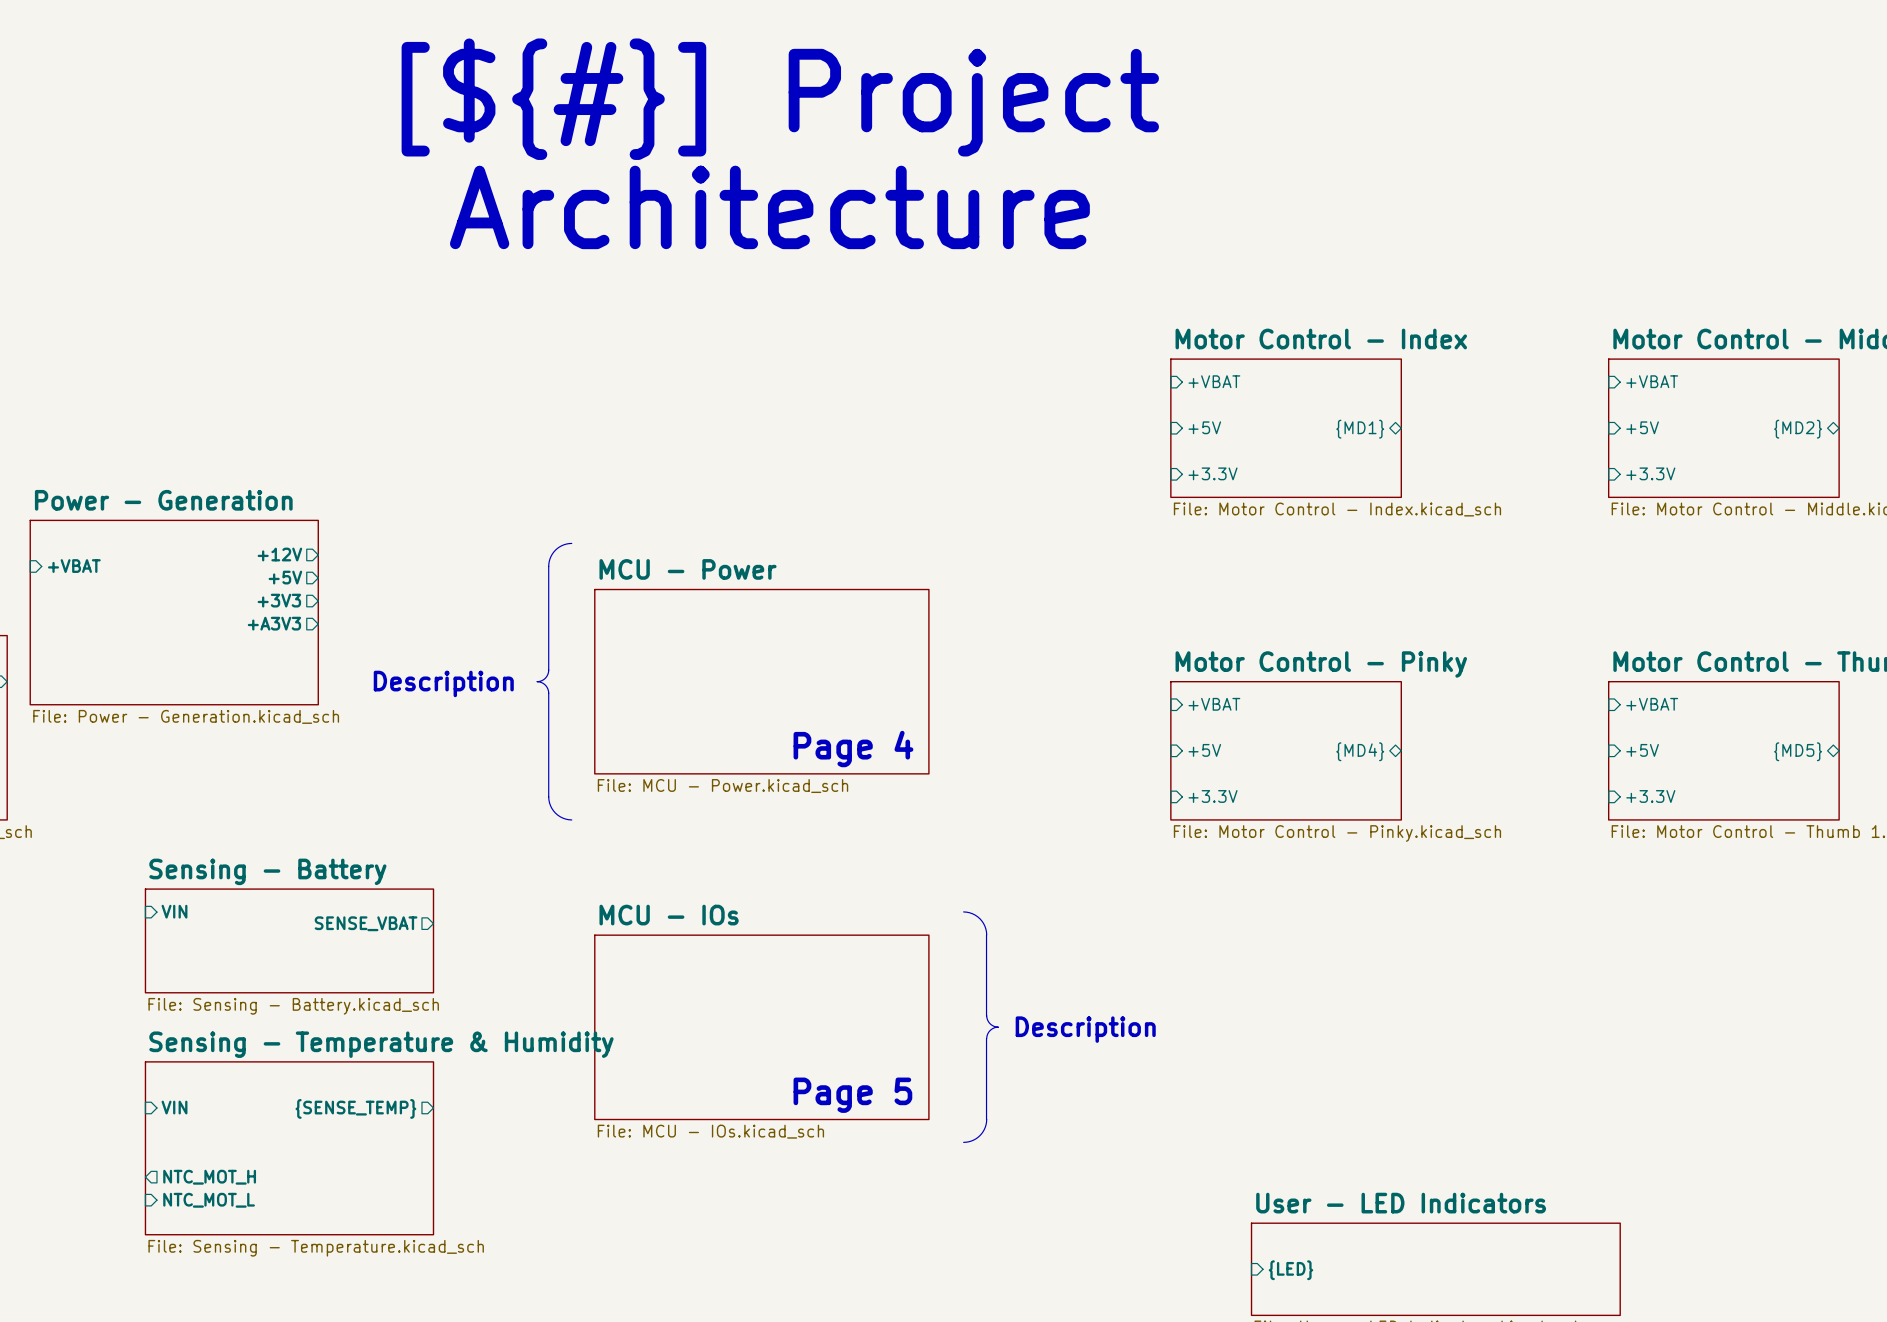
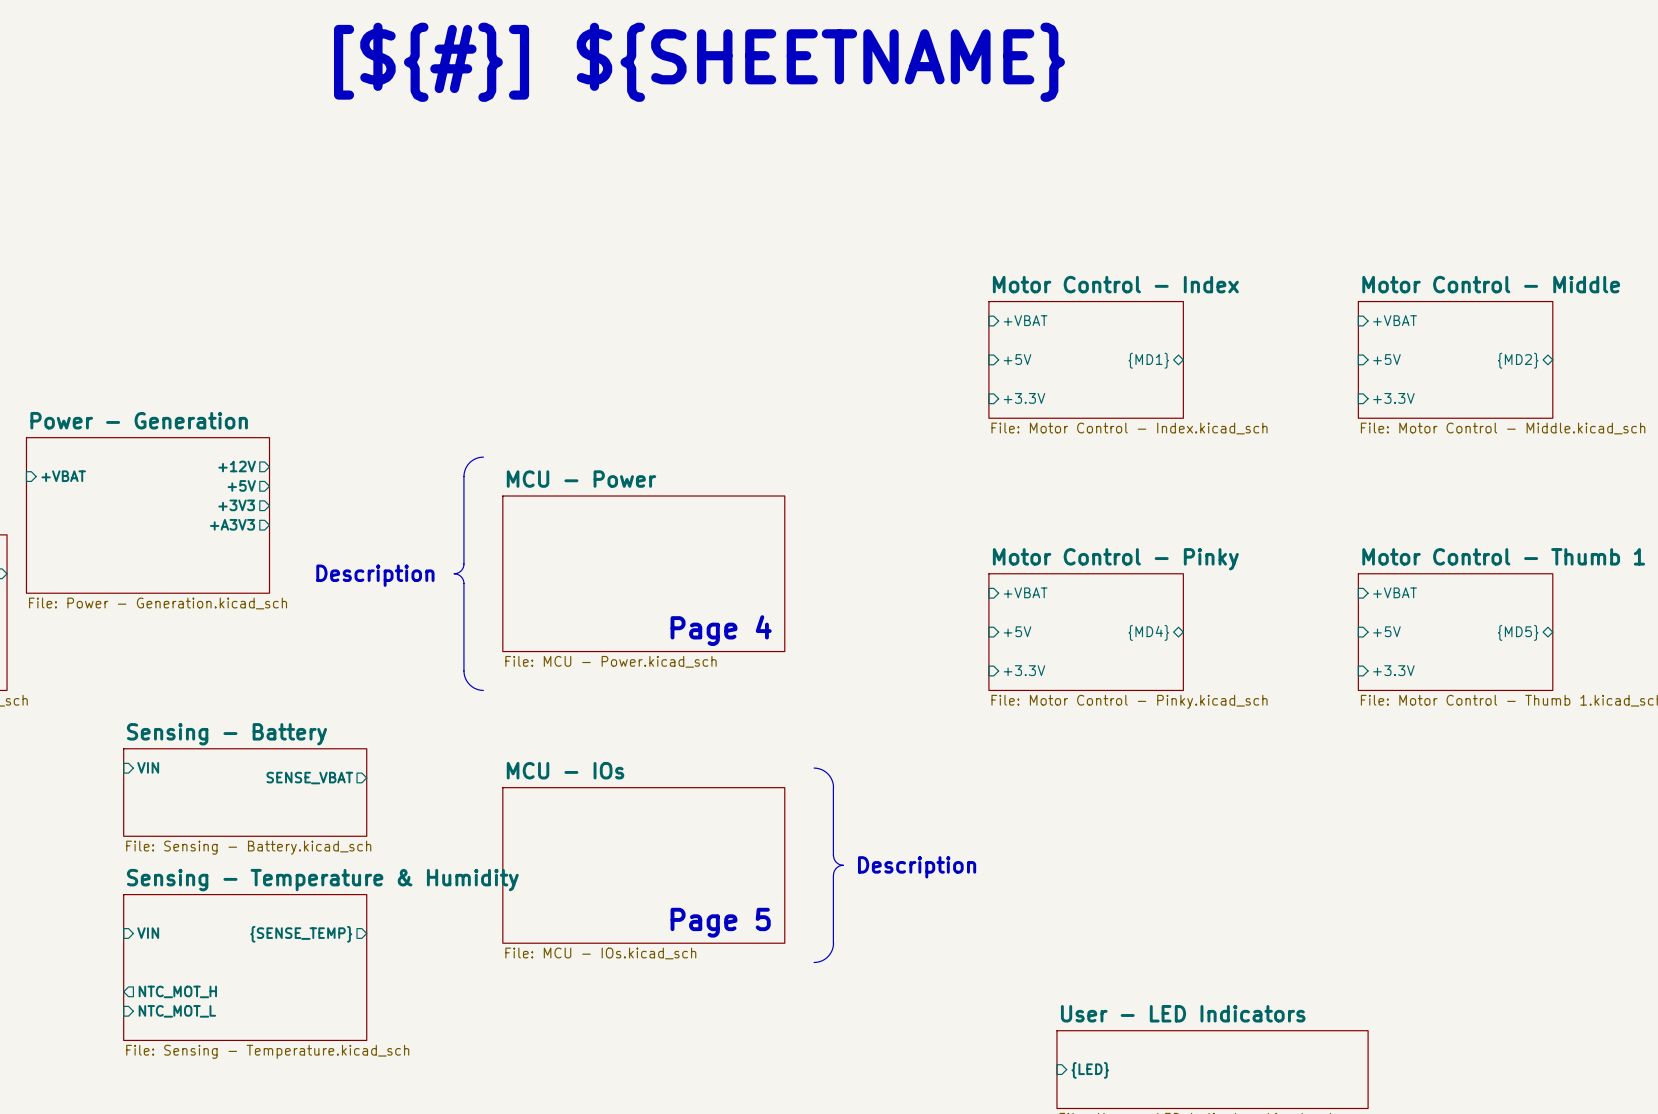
text: none -> [${#}] ${SHEETNAME} (699, 62)
text: [${#}] Project (780, 99) -> none
text: Architecture (769, 207) -> none

